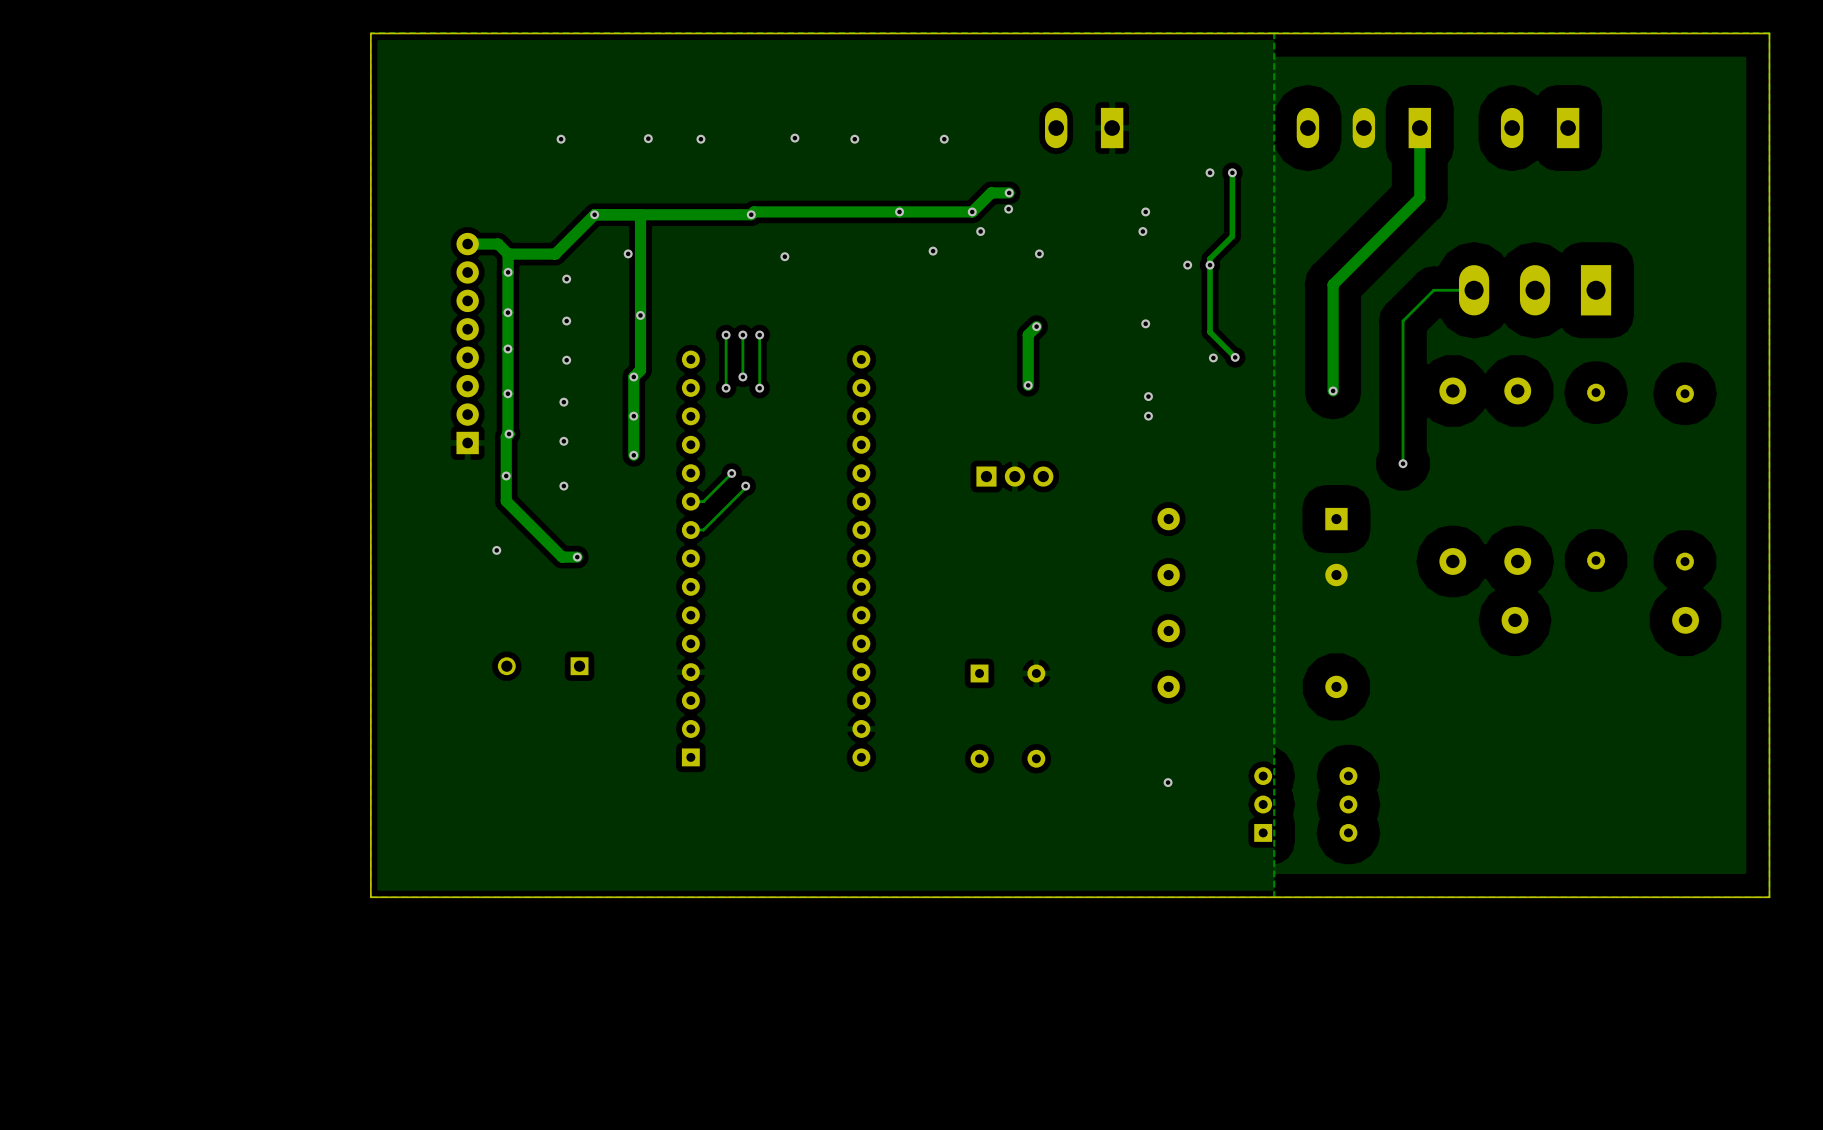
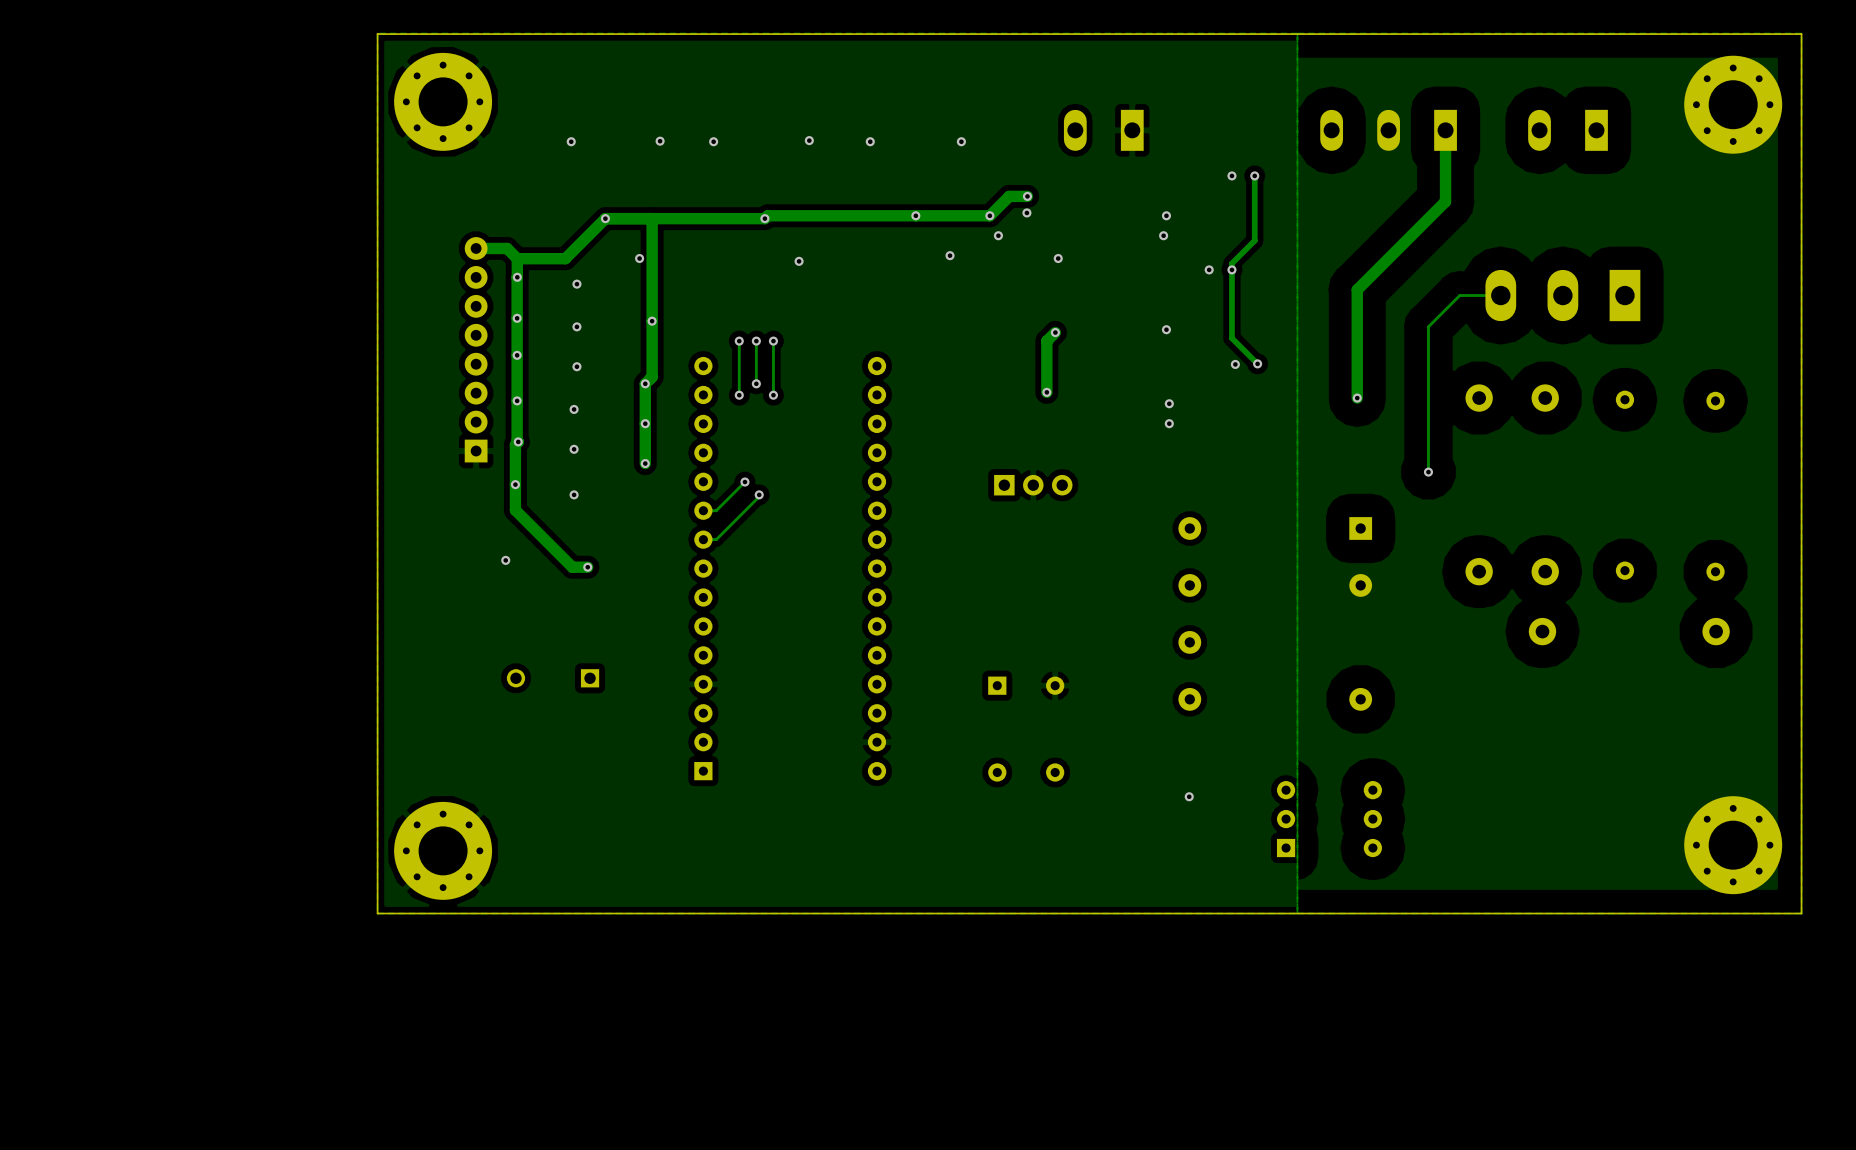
part: none -> (443, 101)
part: none -> (1733, 104)
part: none -> (1733, 845)
part: none -> (443, 850)

